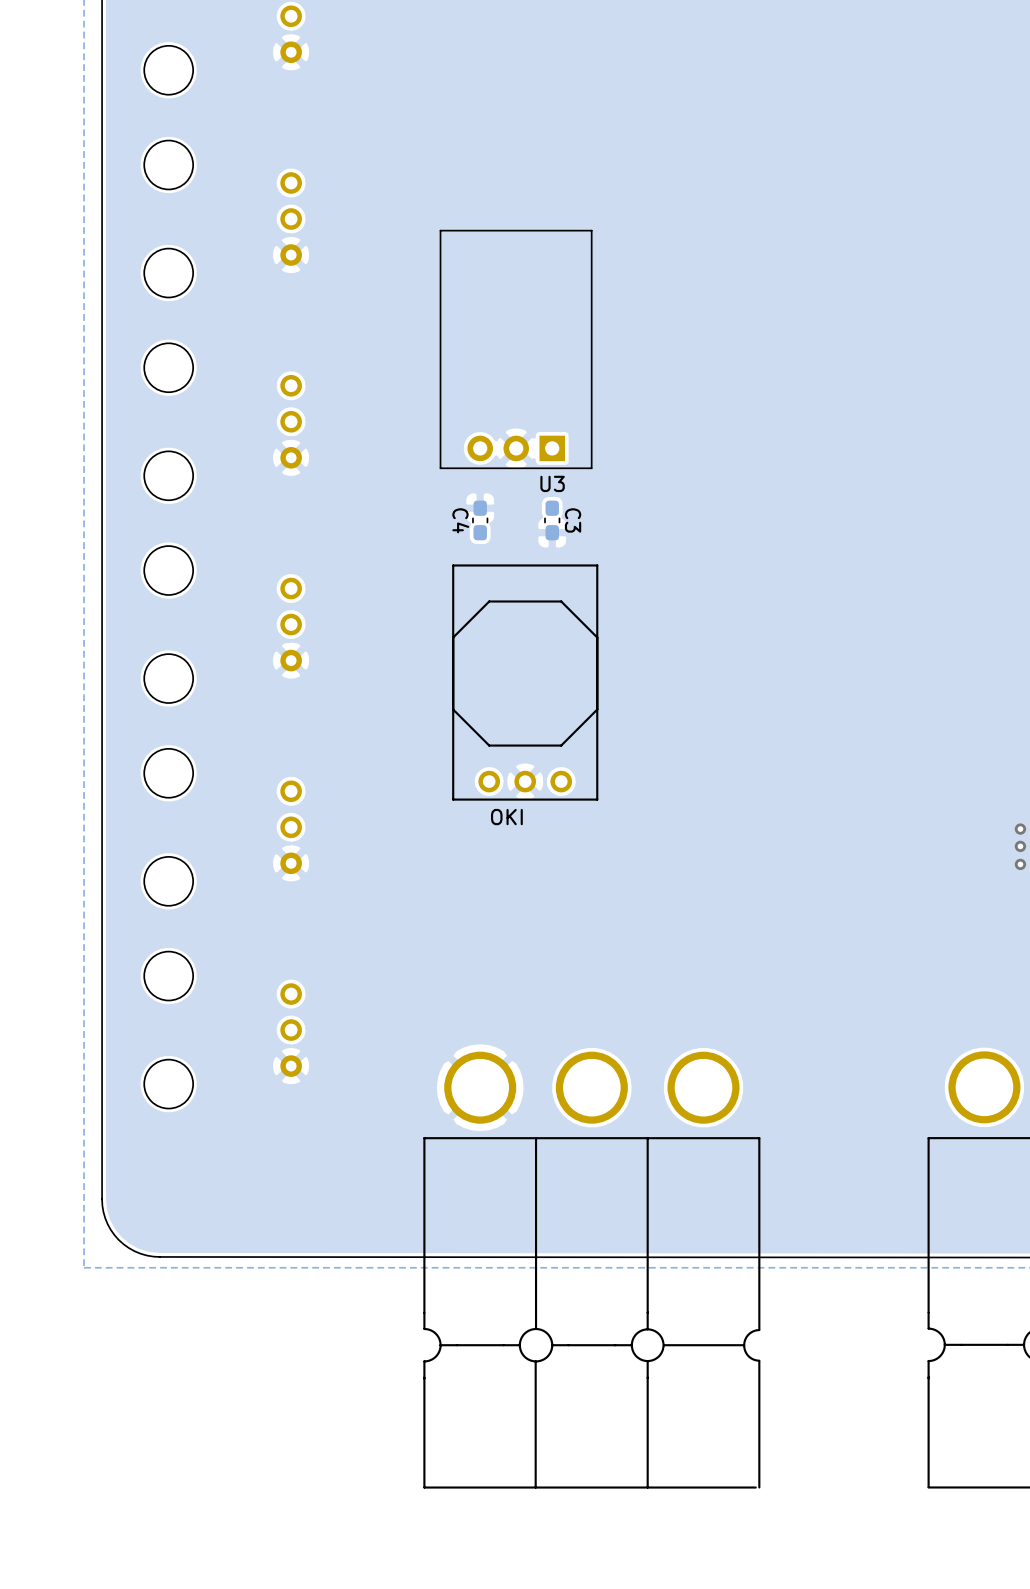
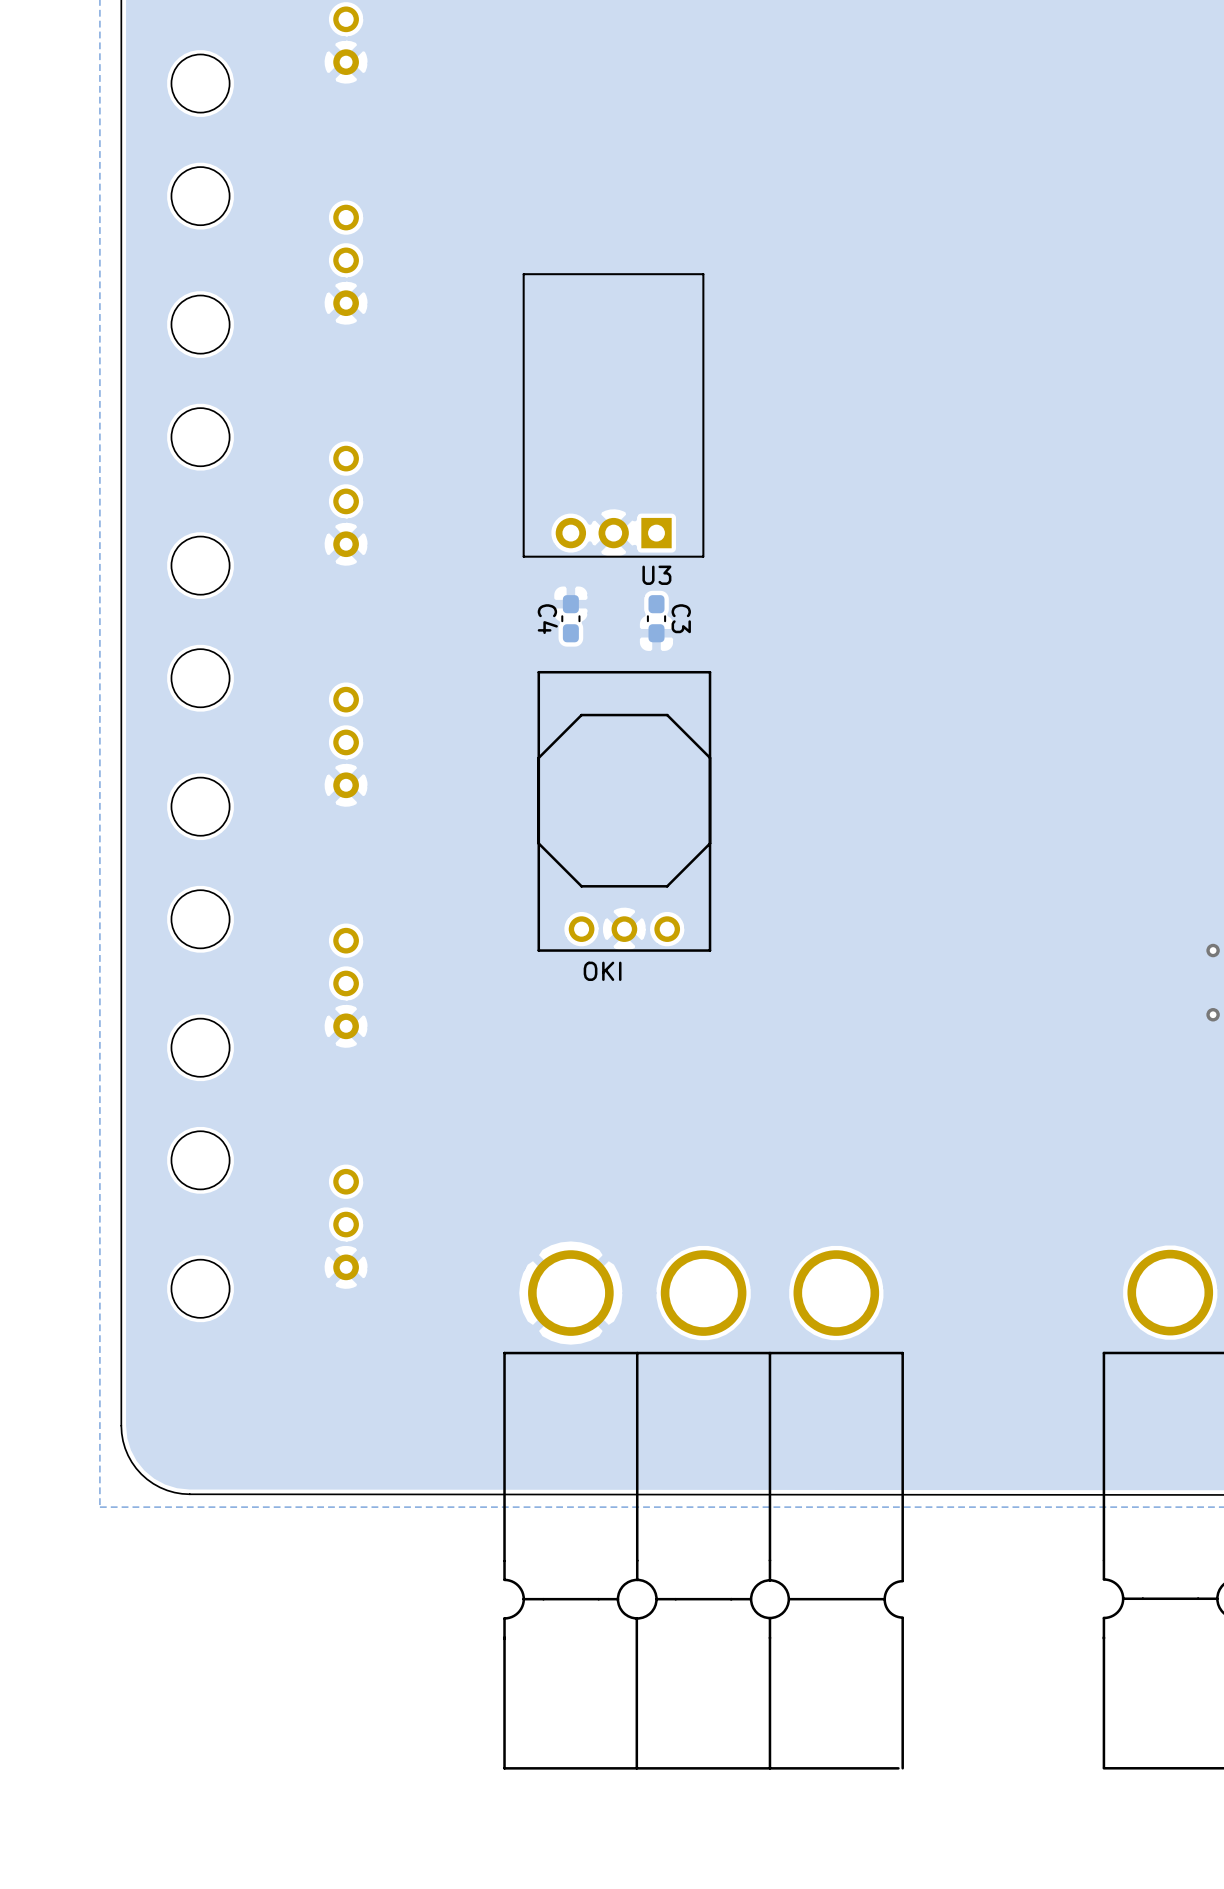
via: none -> (1213, 950)
via: (1020, 829) -> none
via: (1020, 846) -> none
via: none -> (1213, 1014)
via: (1020, 864) -> none

